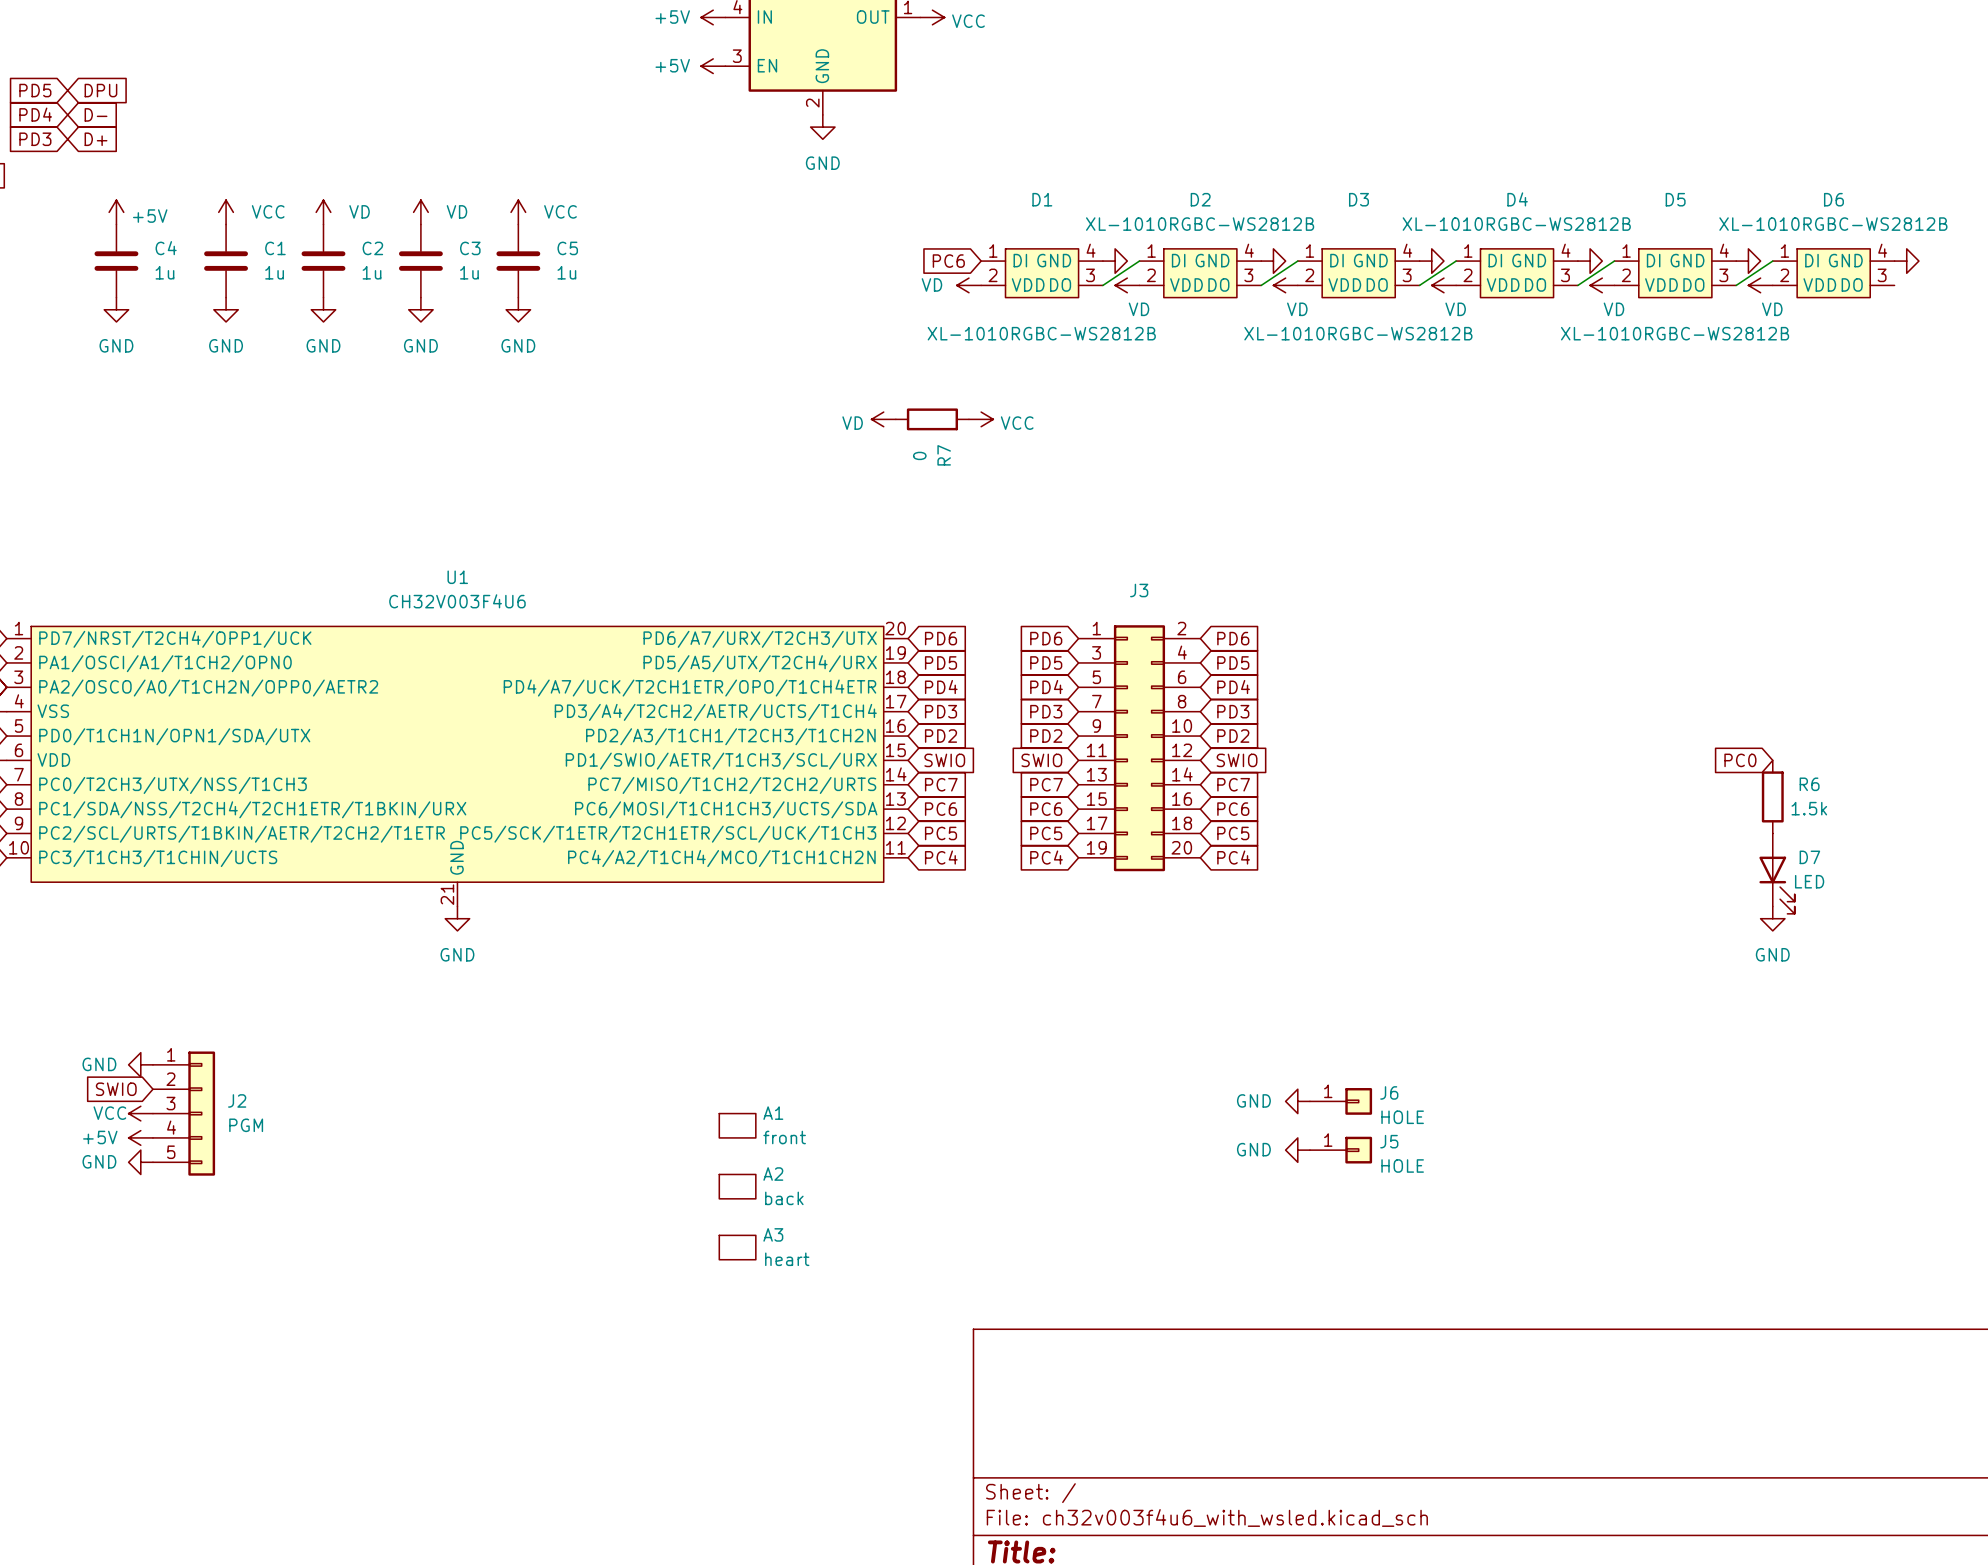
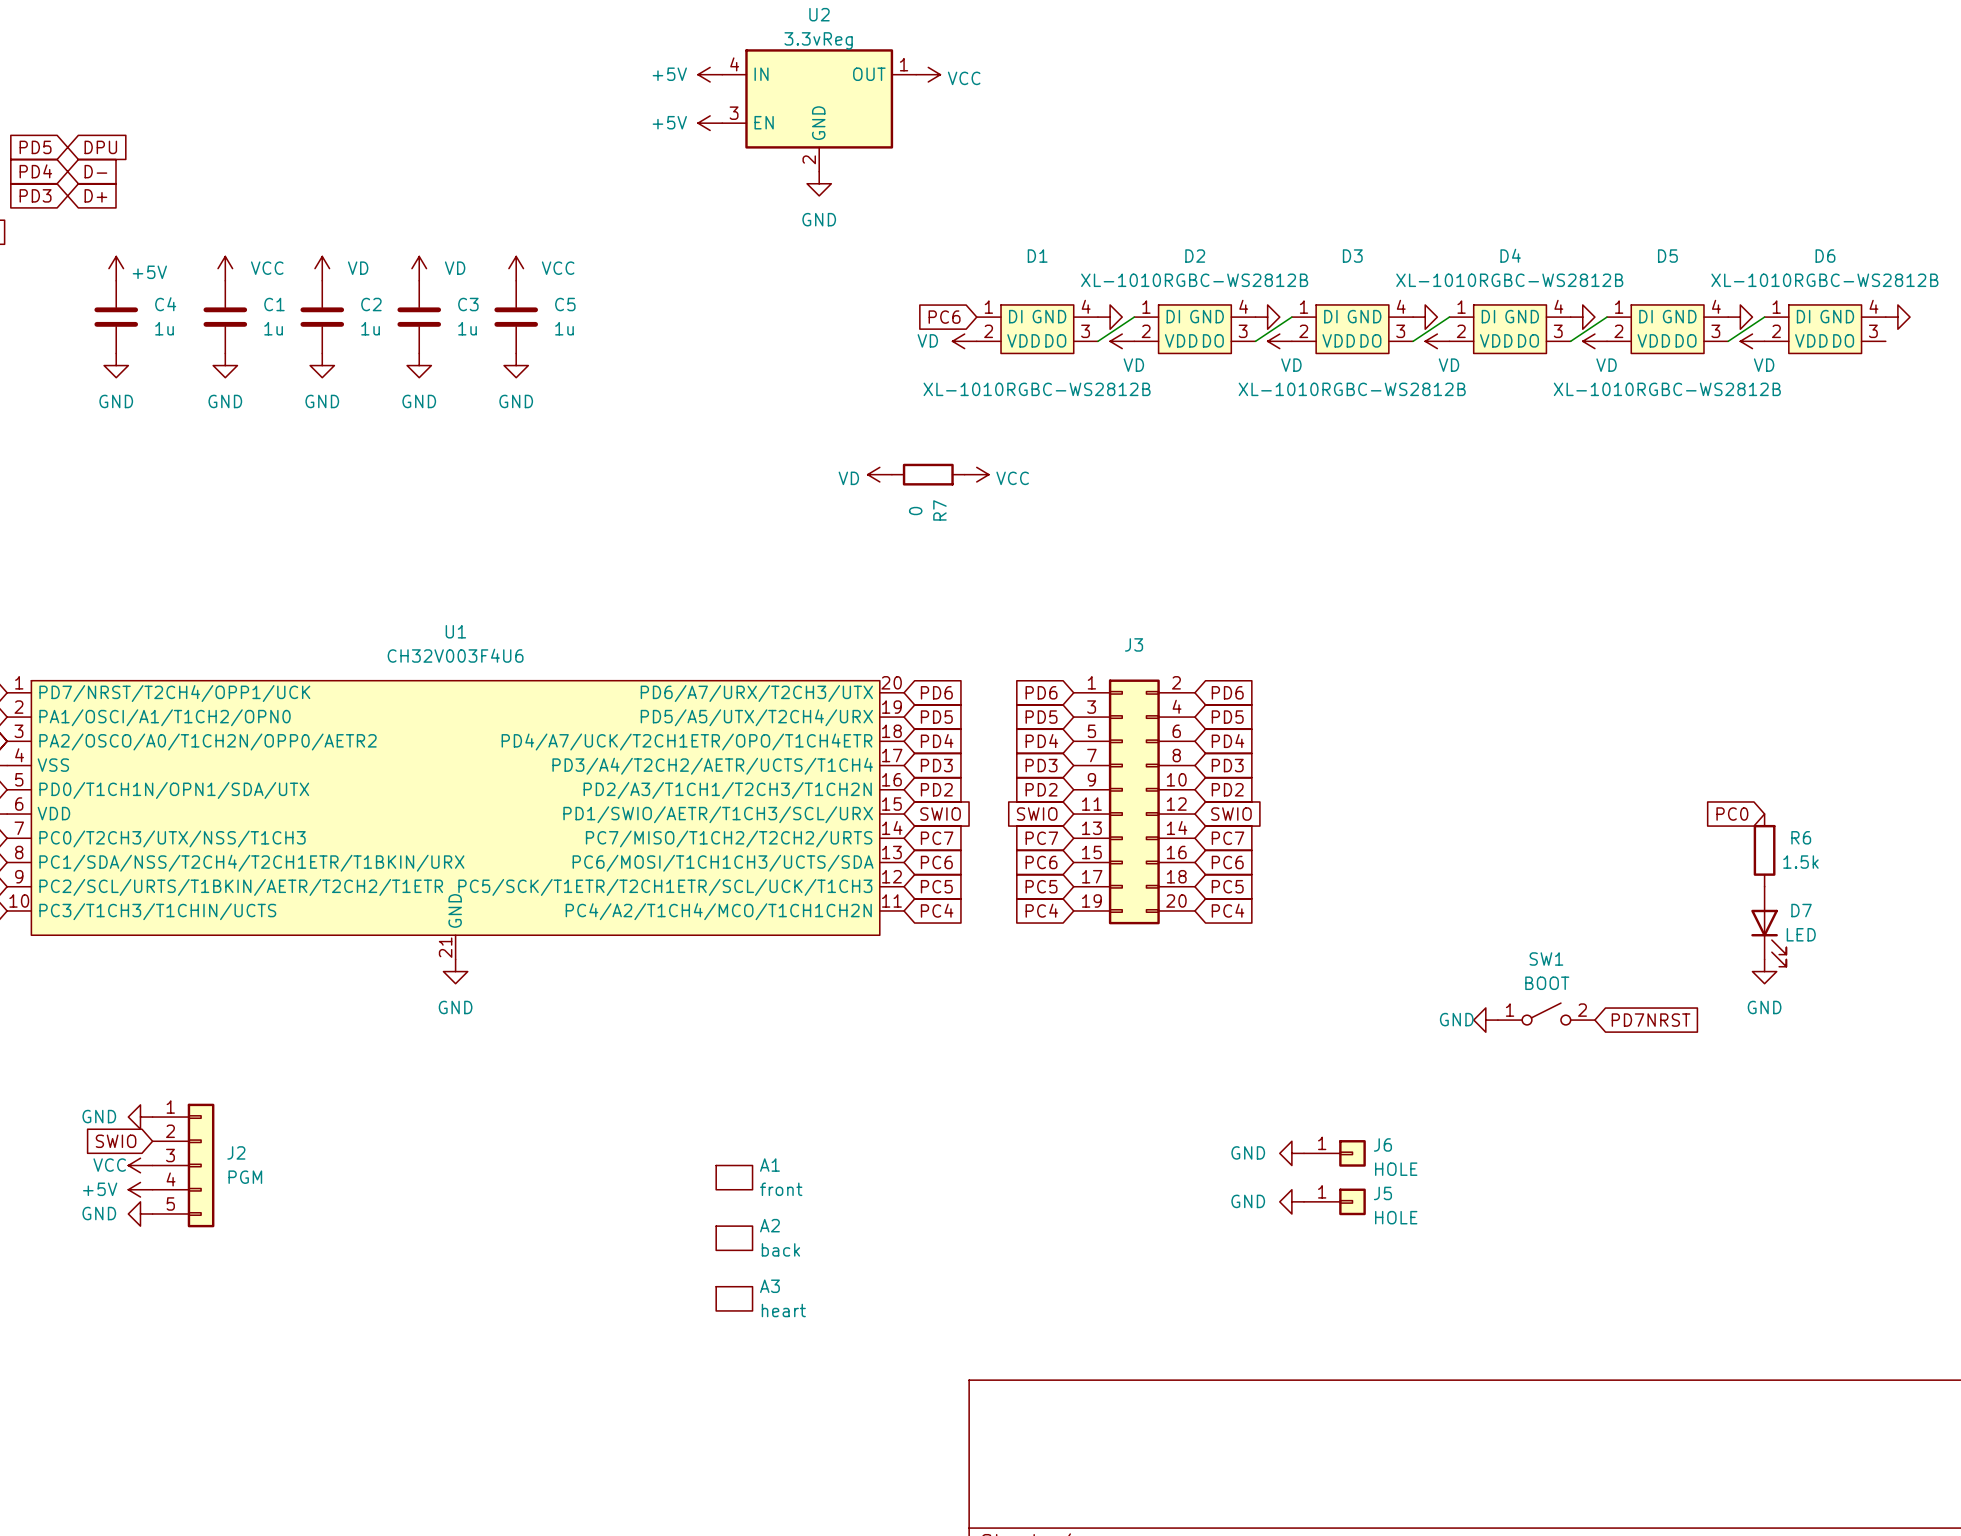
SW1: none -> BOOT (1546, 1014)
power symbol: none -> GND (1485, 1020)
global label: none -> PD7NRST (1651, 1020)

